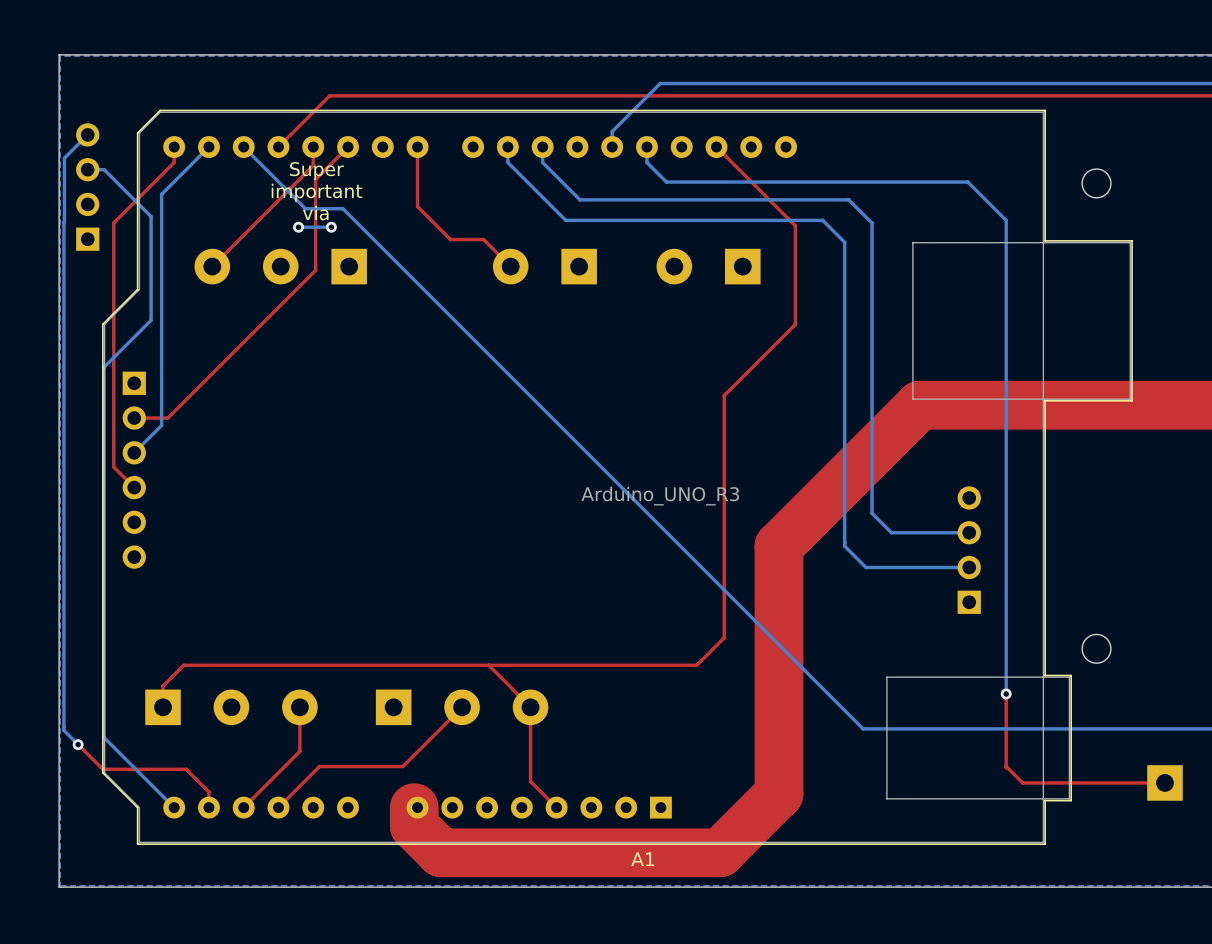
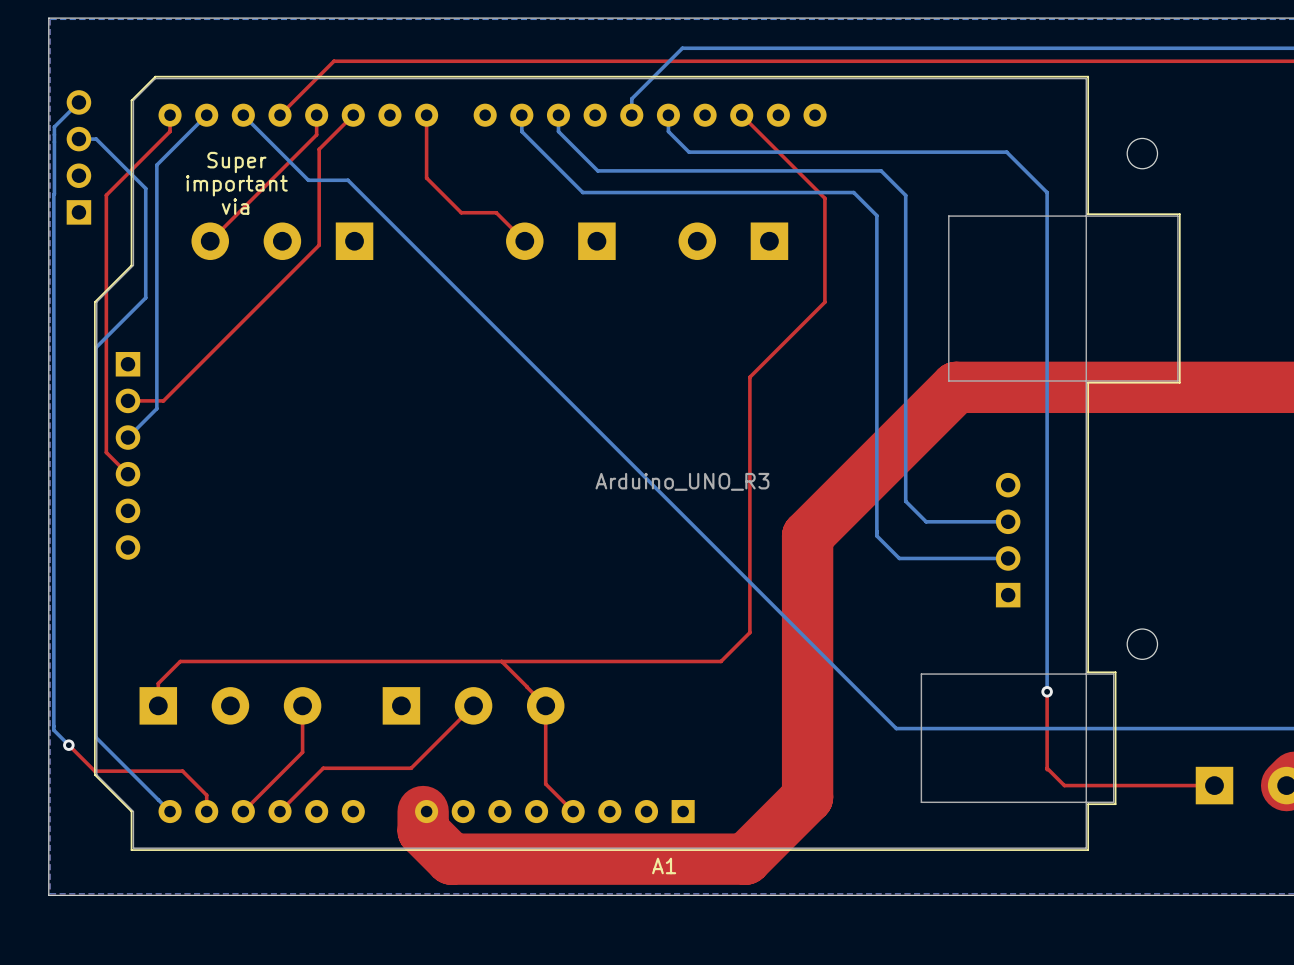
text position: Super (316, 170) -> Super (236, 162)
text position: important (316, 192) -> important (236, 185)
text position: via (315, 213) -> via (235, 206)
via: (298, 227) -> none
bottom track: (331, 227) (298, 227) -> none
via: (331, 227) -> none

